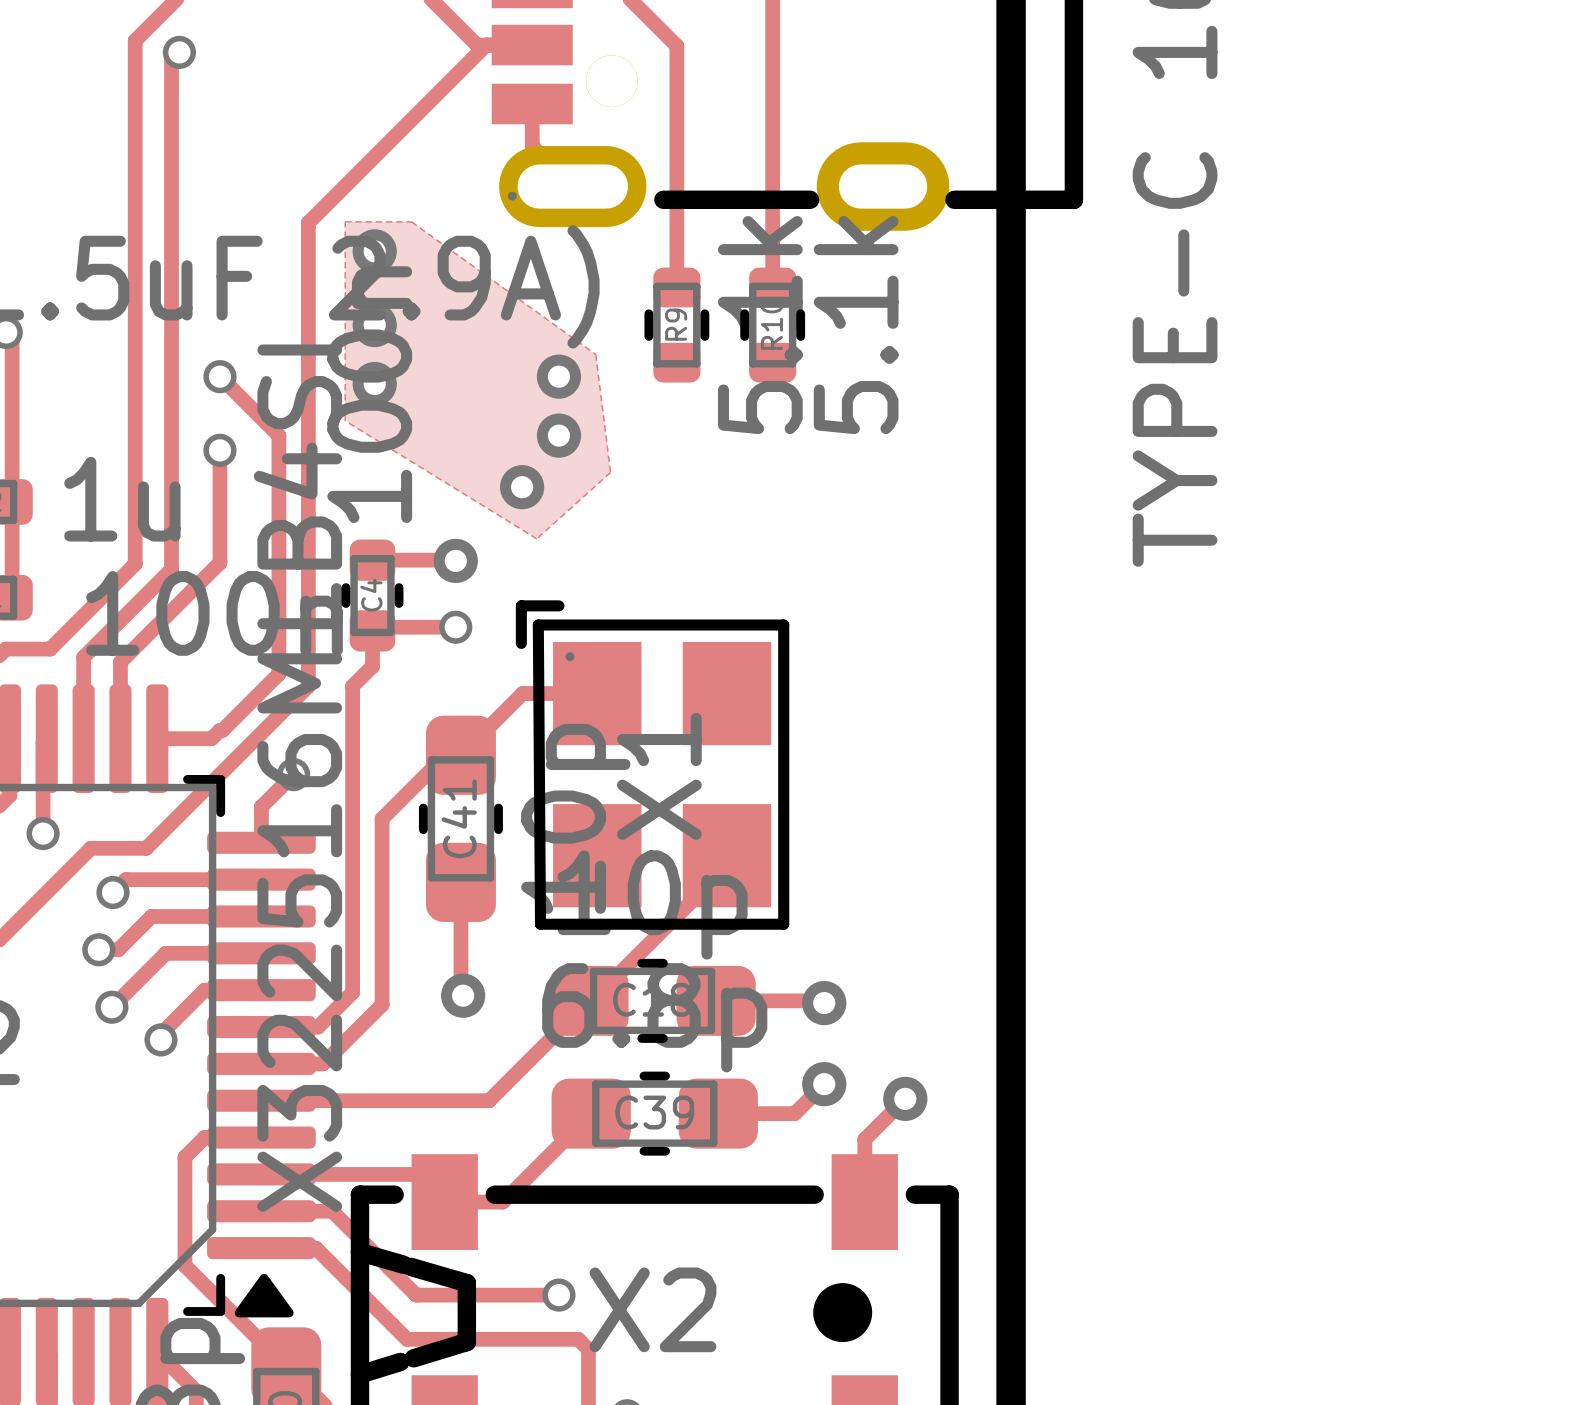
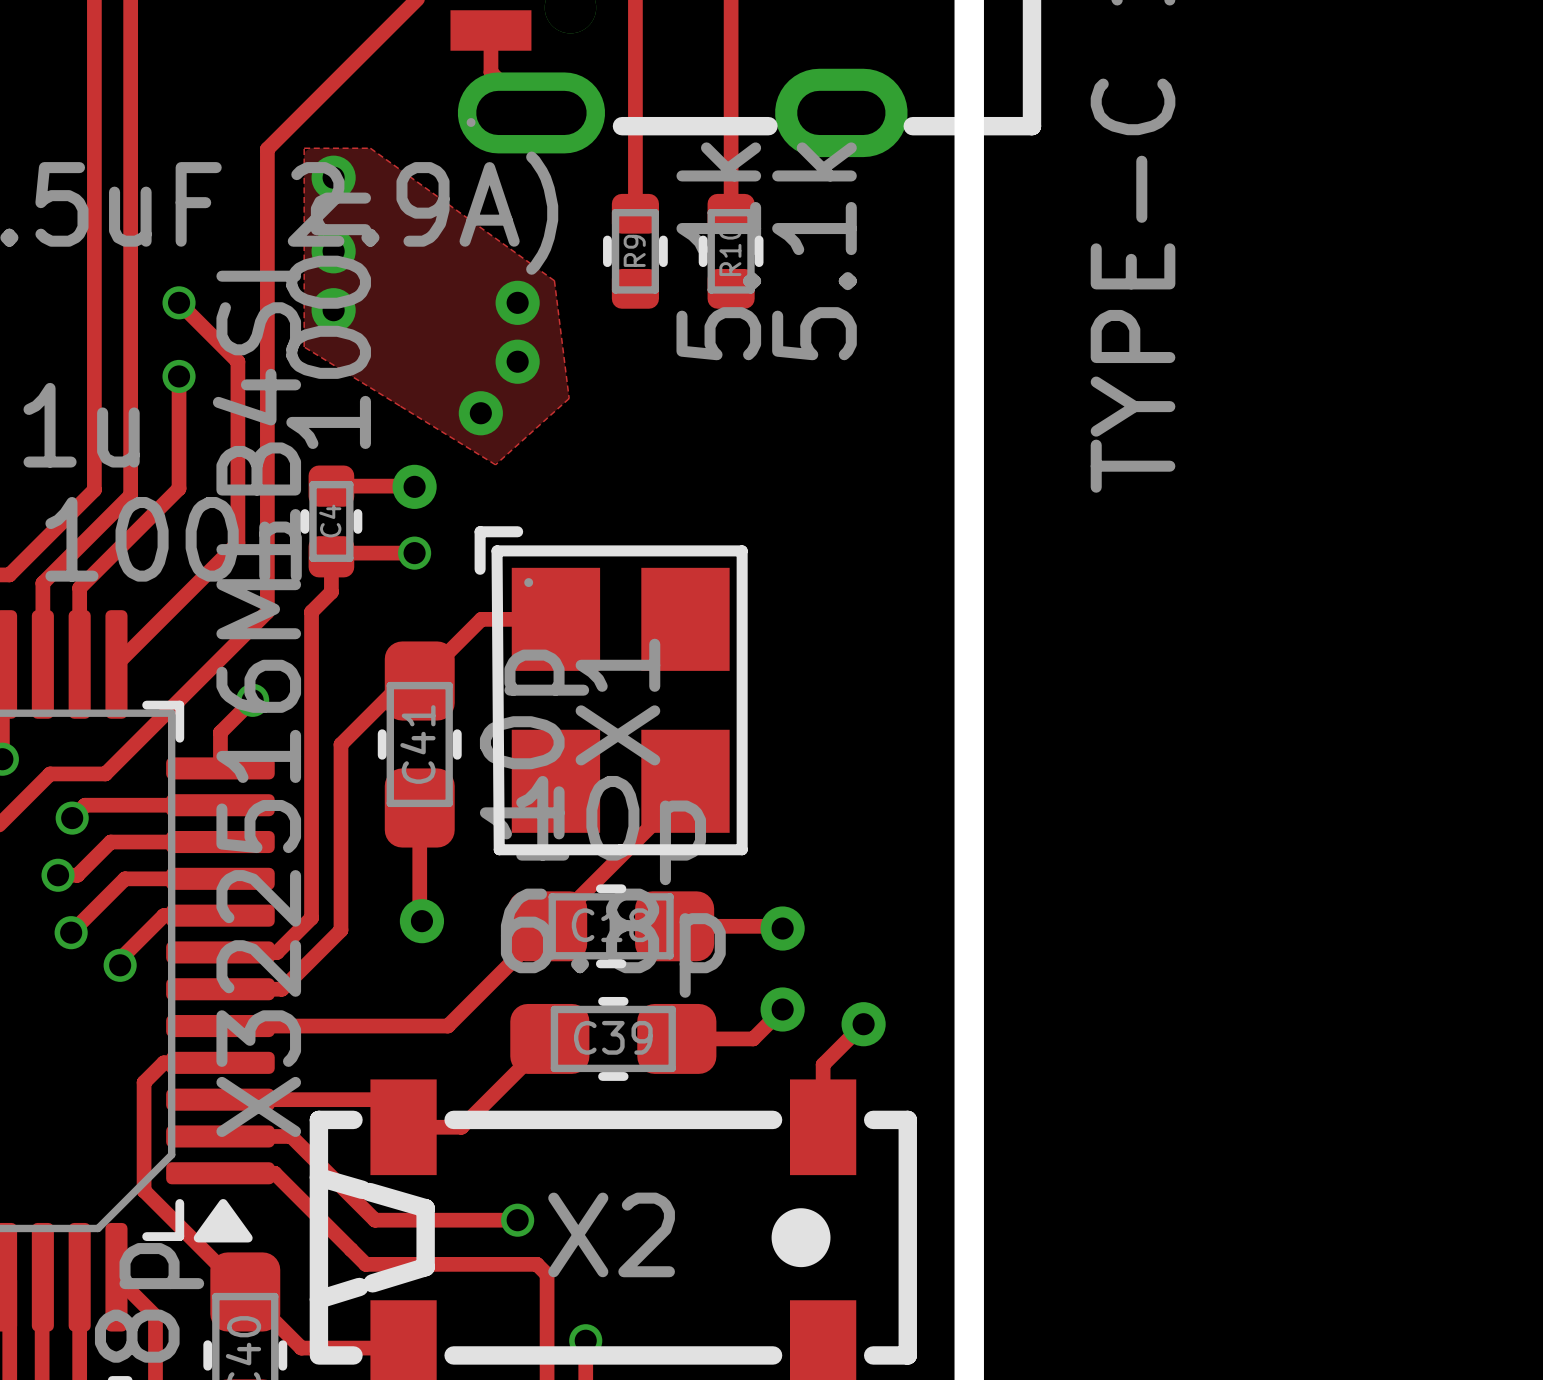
track: (278, 617) (278, 673) (222, 730) (219, 730) (211, 738) (157, 738) -> (237, 542) (116, 664)

